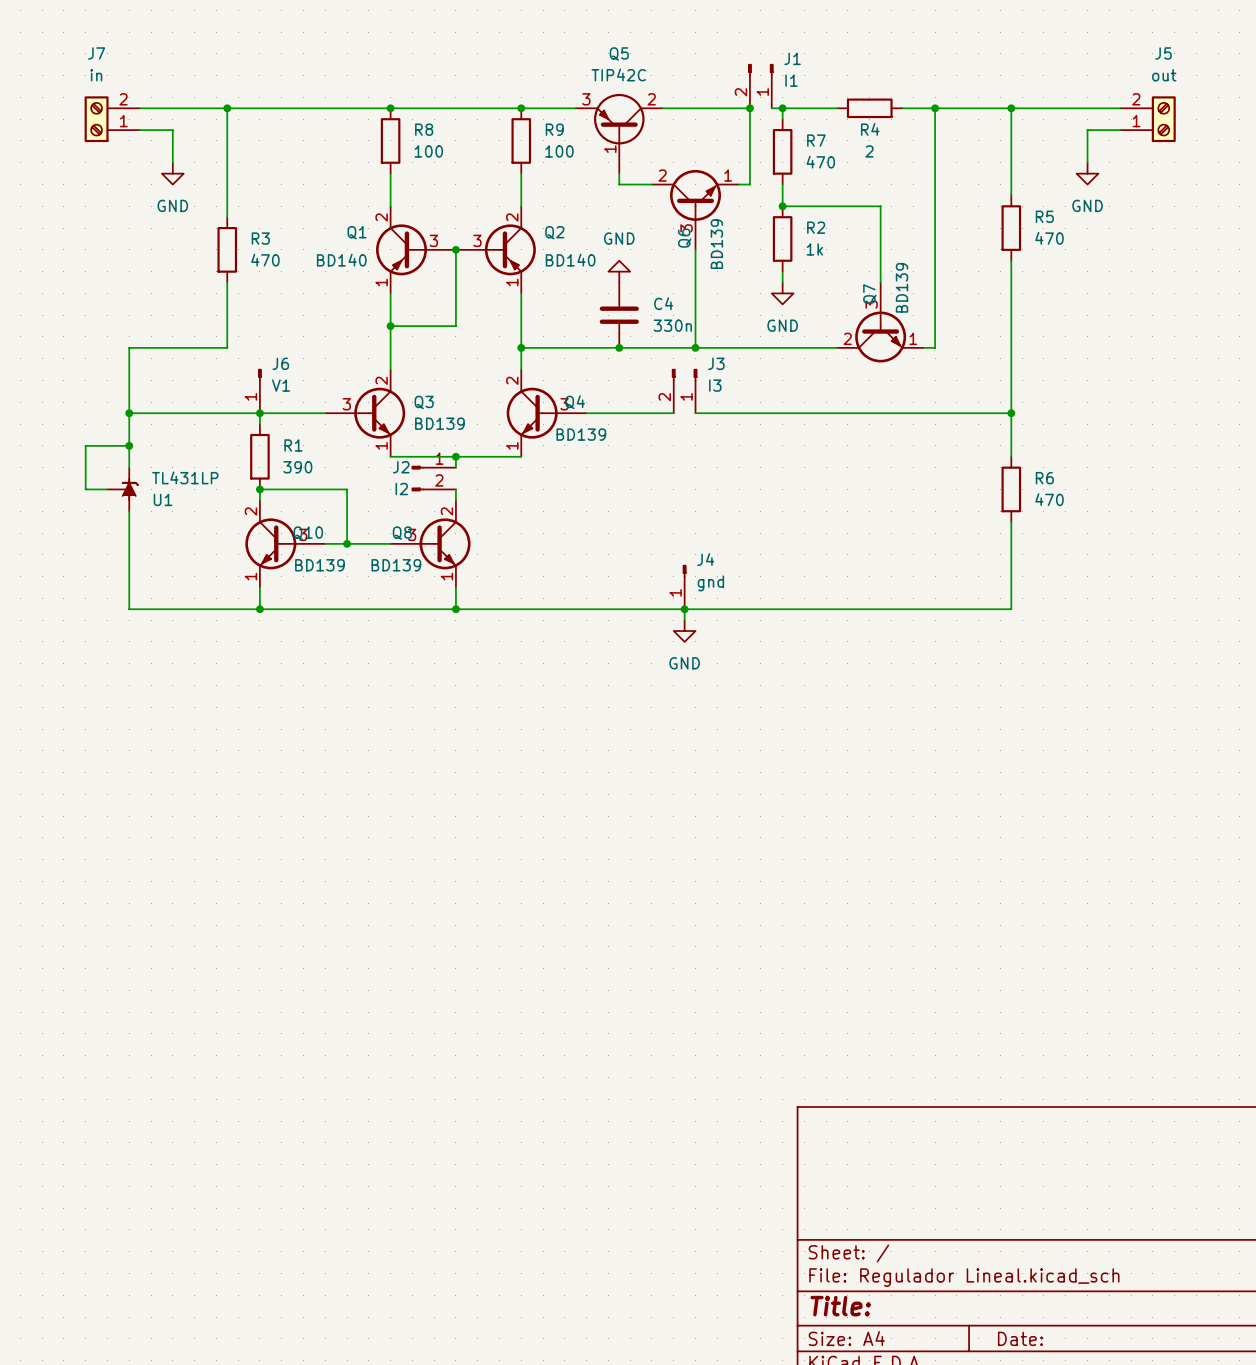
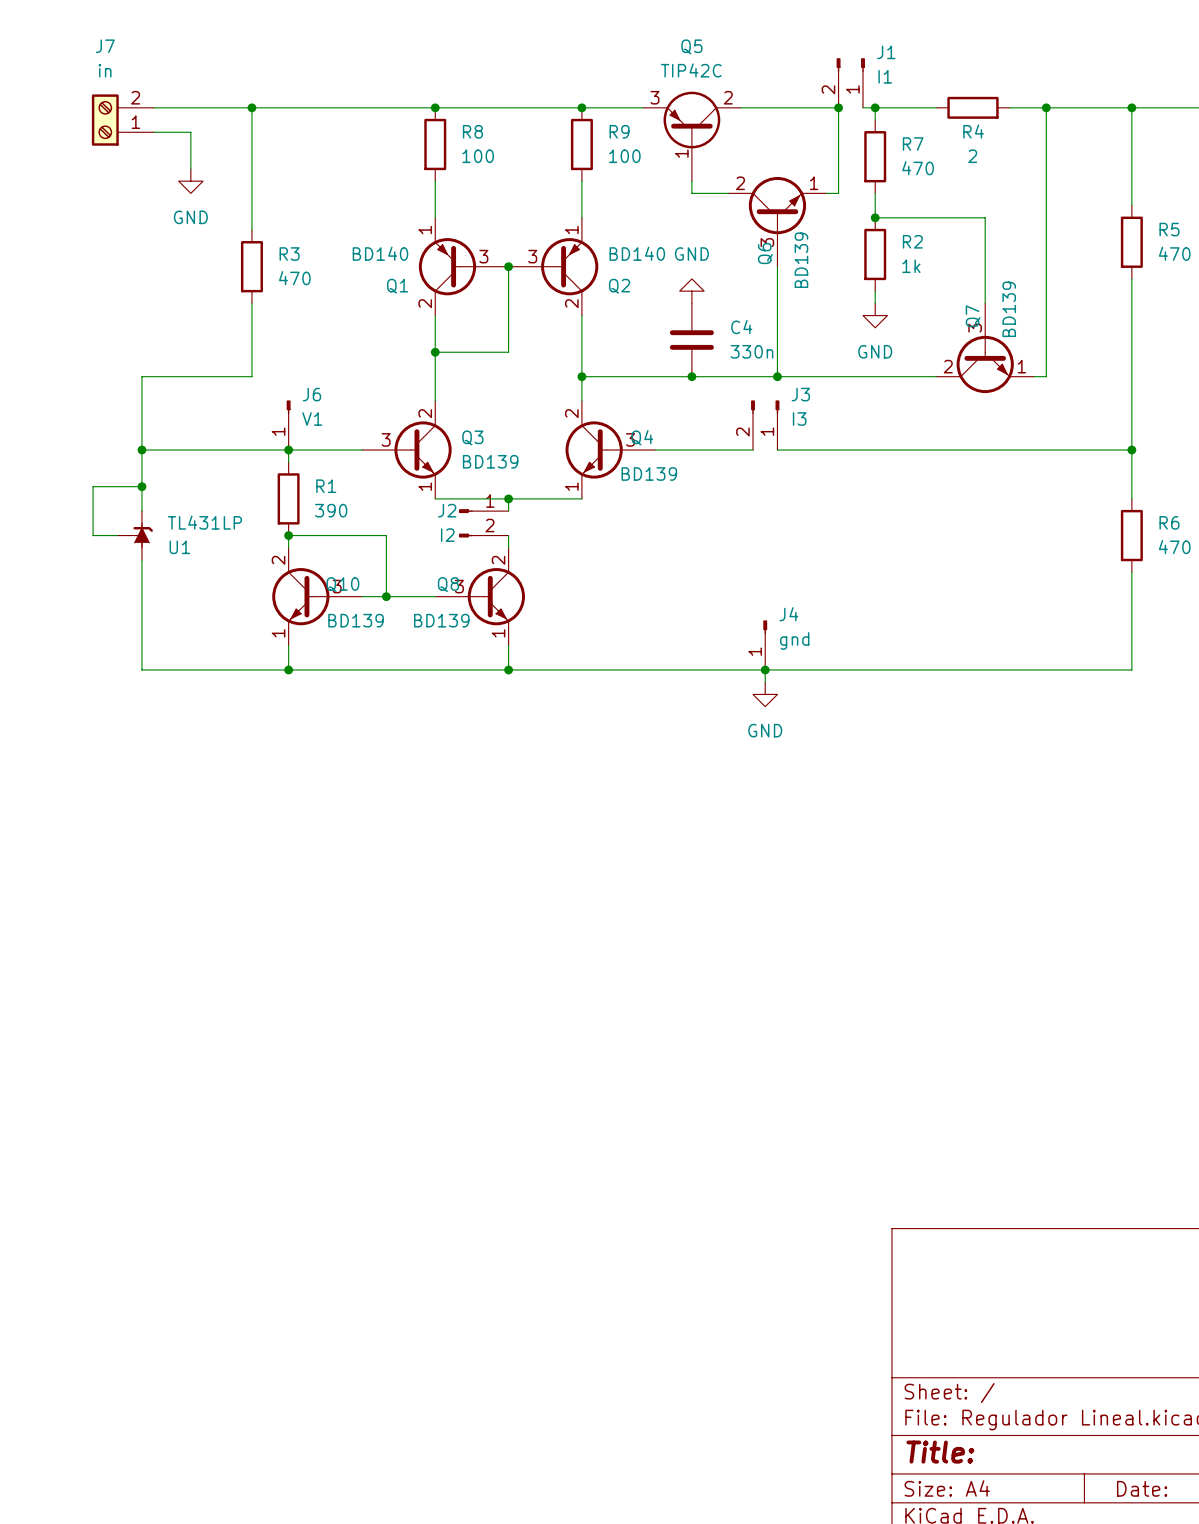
Q1 flip: as is (401, 249) -> up-down (447, 266)
Q2 flip: as is (510, 249) -> up-down (569, 266)

